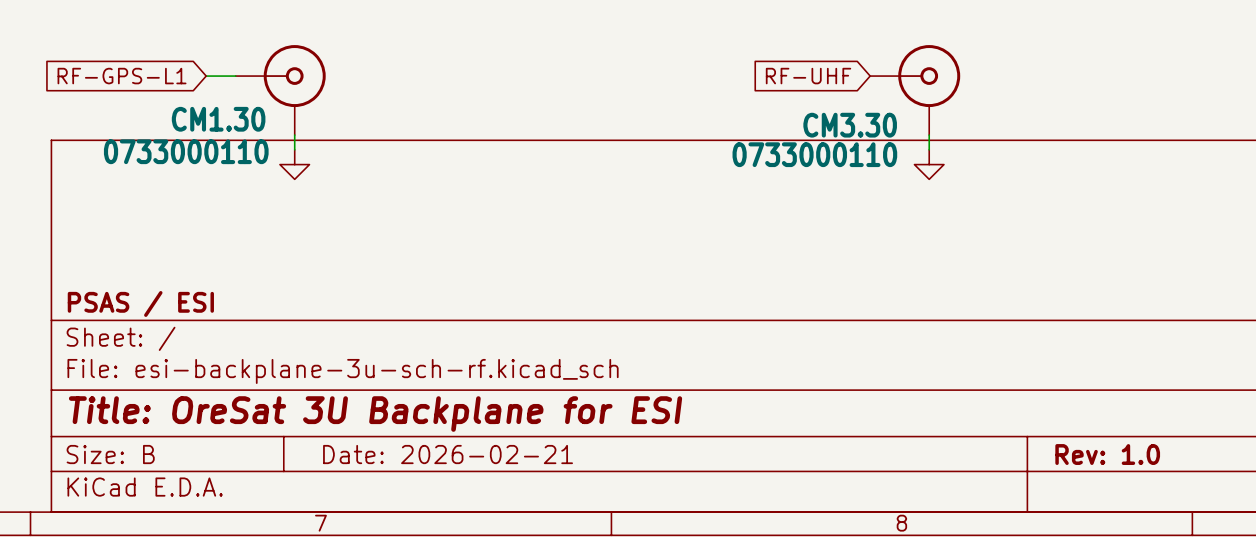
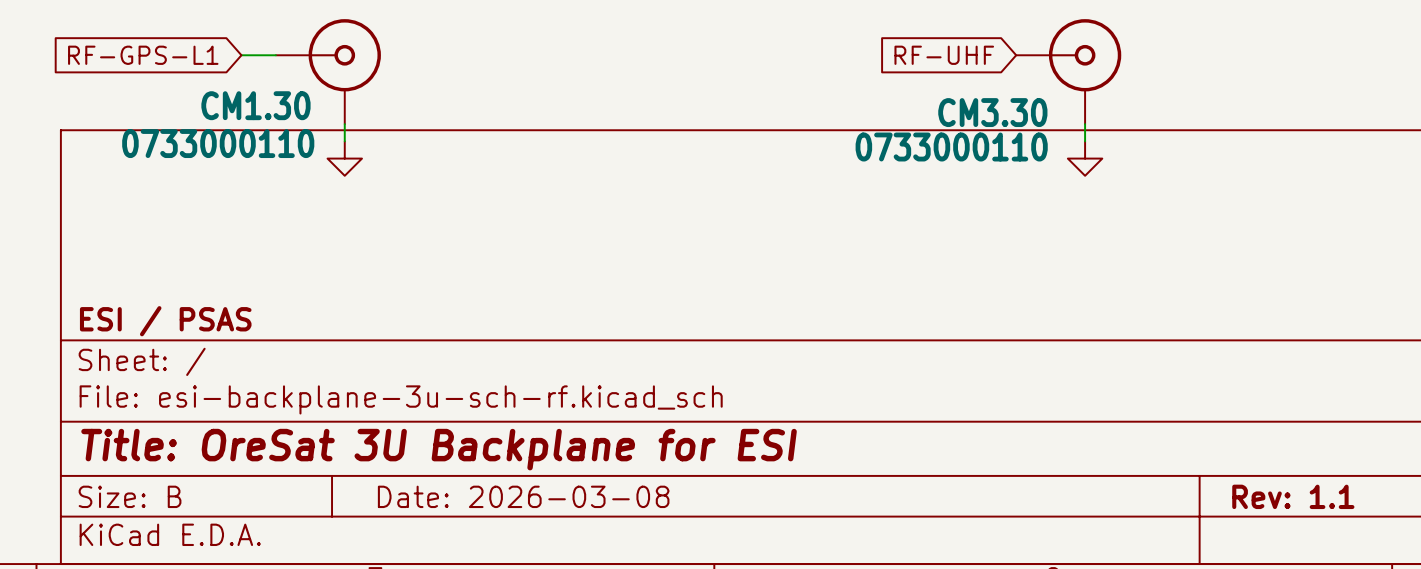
title block: PSAS / ESI (140, 303) -> ESI / PSAS (165, 321)
title block: Date: 2026-02-21 (448, 454) -> Date: 2026-03-08 (523, 496)
title block: Rev: 1.0 (1107, 454) -> Rev: 1.1 (1293, 496)

